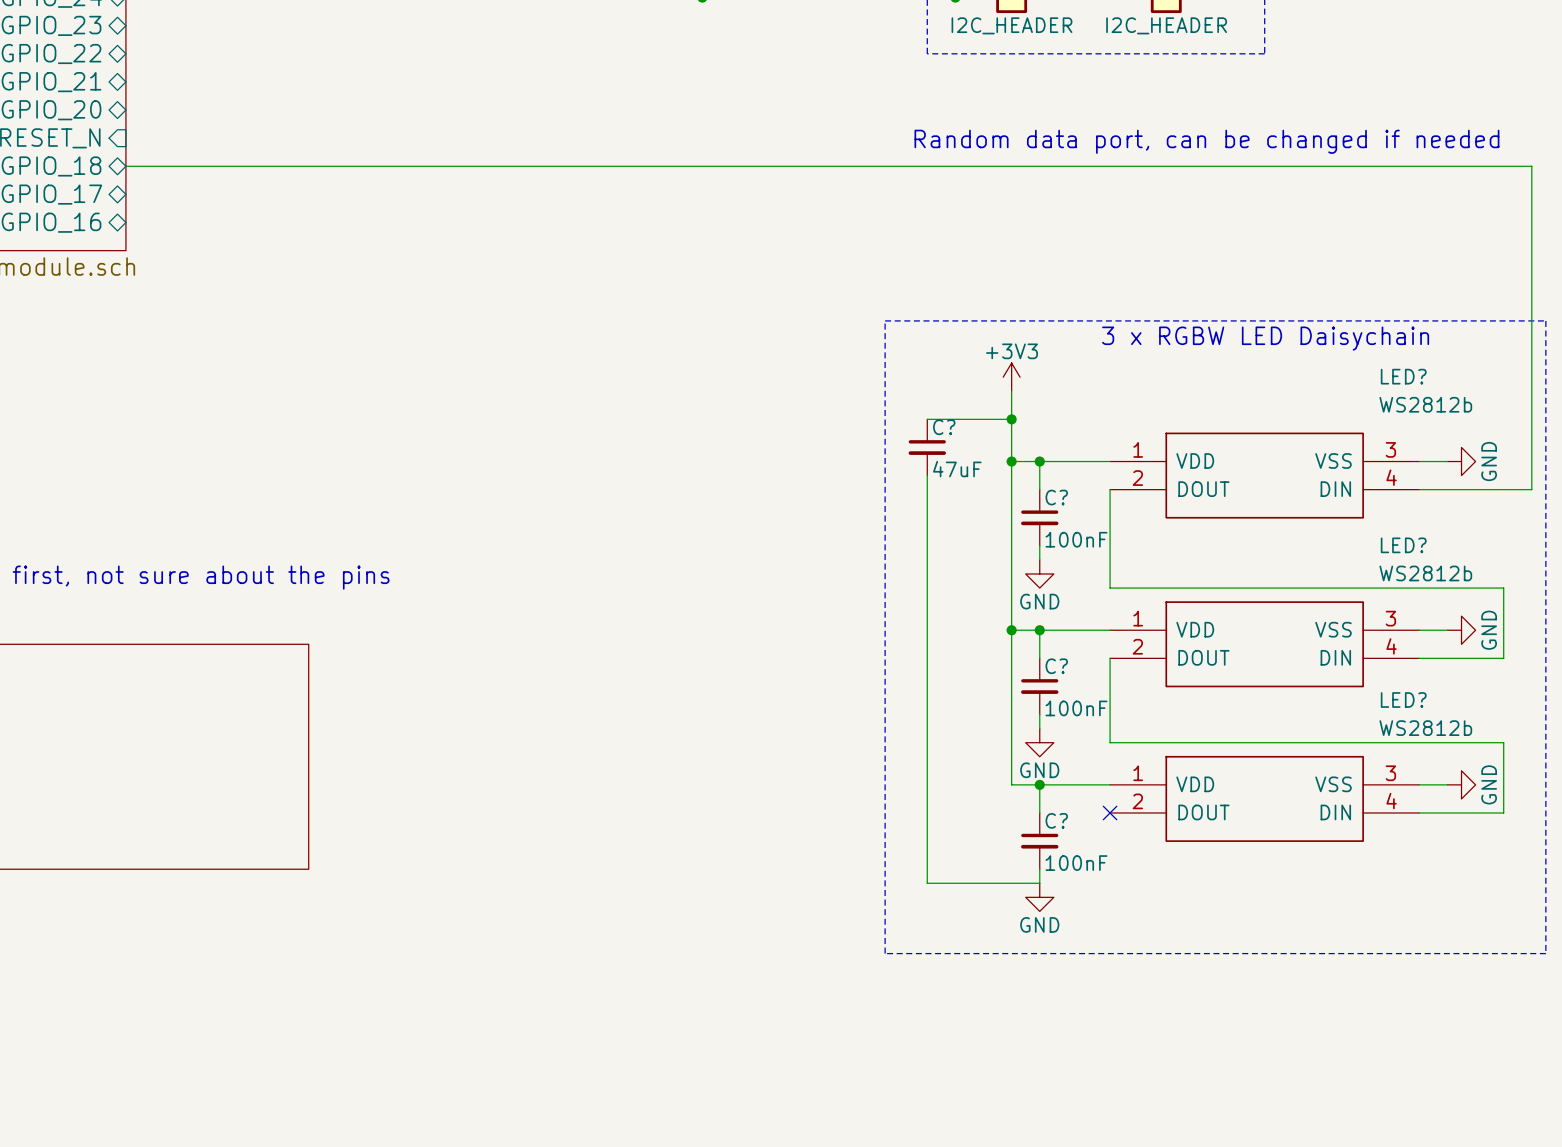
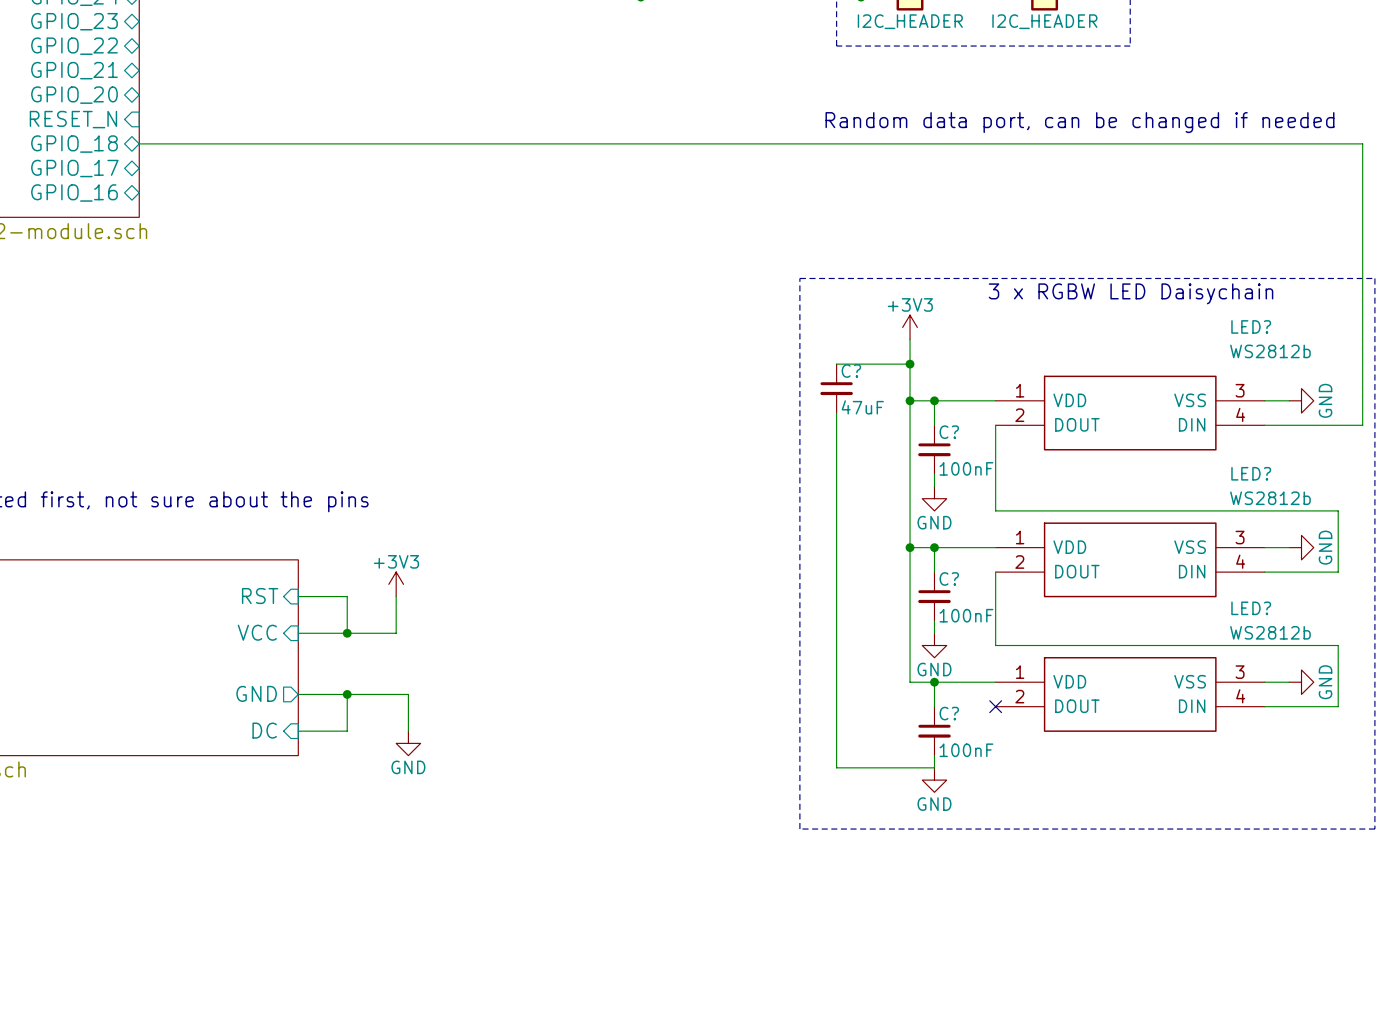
power symbol: none -> +3V3 (396, 584)
sheet pin: none -> RST (260, 596)
wire: none -> (298, 596) (347, 596) (347, 633)
wire: none -> (396, 596) (396, 633) (298, 633)
sheet pin: none -> VCC (257, 632)
junction: none -> (347, 633)
sheet pin: none -> GND (256, 693)
wire: none -> (298, 694) (408, 694) (408, 731)
wire: none -> (347, 694) (347, 731) (298, 731)
junction: none -> (347, 694)
sheet pin: none -> DC (264, 730)
power symbol: none -> GND (408, 743)

